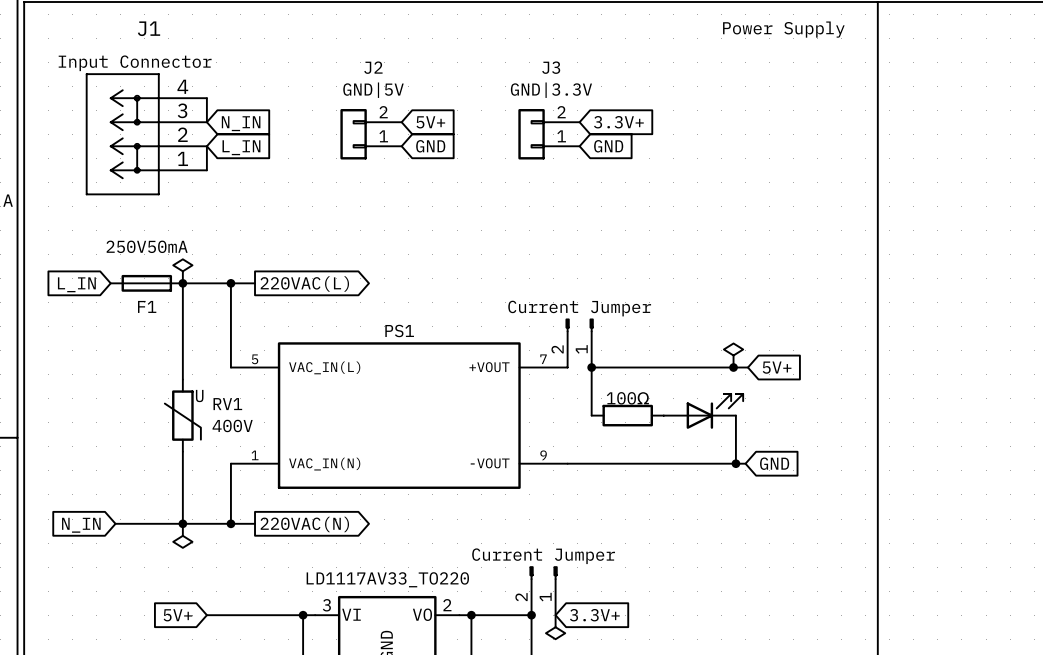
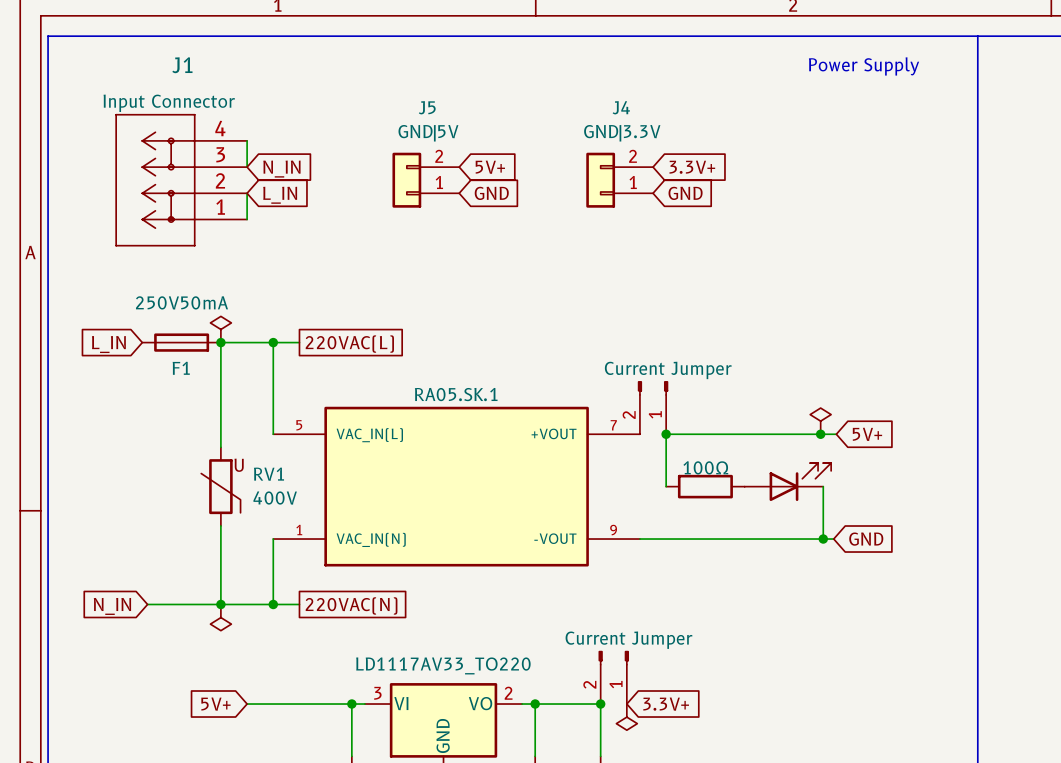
J2 name: J2 (373, 67) -> J5 (427, 107)
J3 name: J3 (551, 67) -> J4 (621, 107)
global label shape: output (304, 284) -> passive (349, 344)
PS1 name: PS1 (399, 330) -> RA05.SK.1 (456, 394)
global label shape: output (304, 524) -> passive (351, 605)

